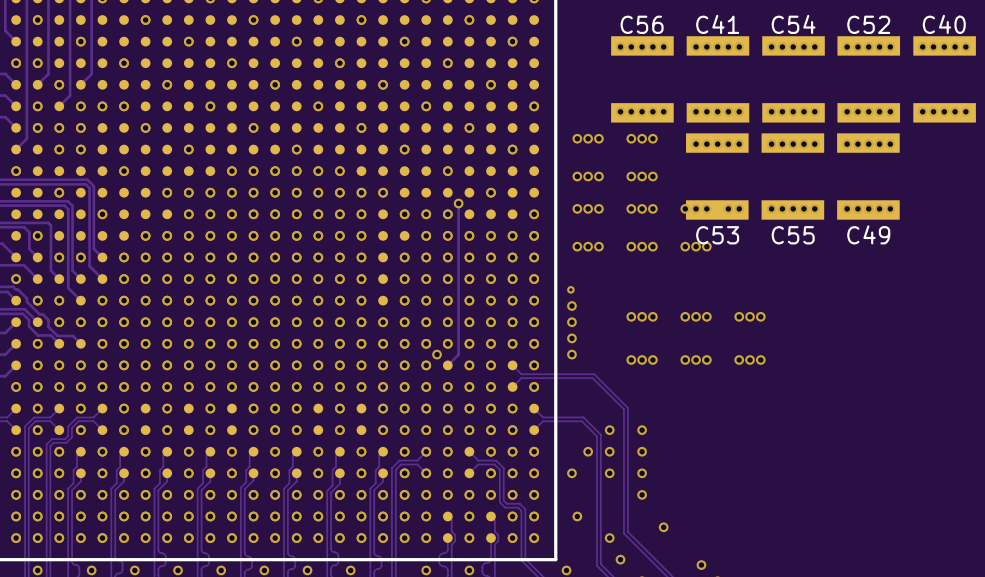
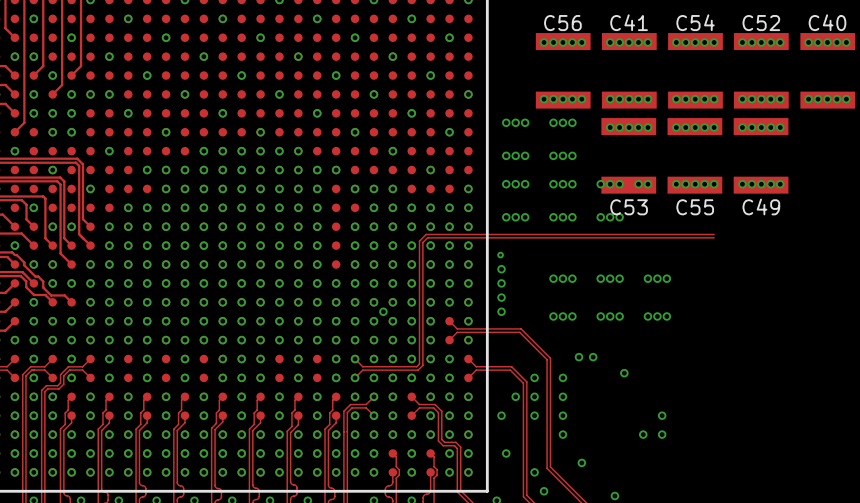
track: (458, 203) (458, 354) (447, 365) -> none
via: (458, 203) -> none
track: none -> (714, 234) (426, 234) (419, 241) (419, 363) (416, 366) (362, 366) (355, 359)
track: none -> (714, 237) (427, 237) (422, 242) (422, 365) (418, 370) (362, 370) (355, 377)
via: none -> (392, 321)
via: none -> (578, 357)
via: none -> (593, 357)
via: none -> (624, 373)
via: none -> (662, 415)
via: none -> (643, 434)
via: none -> (662, 434)

